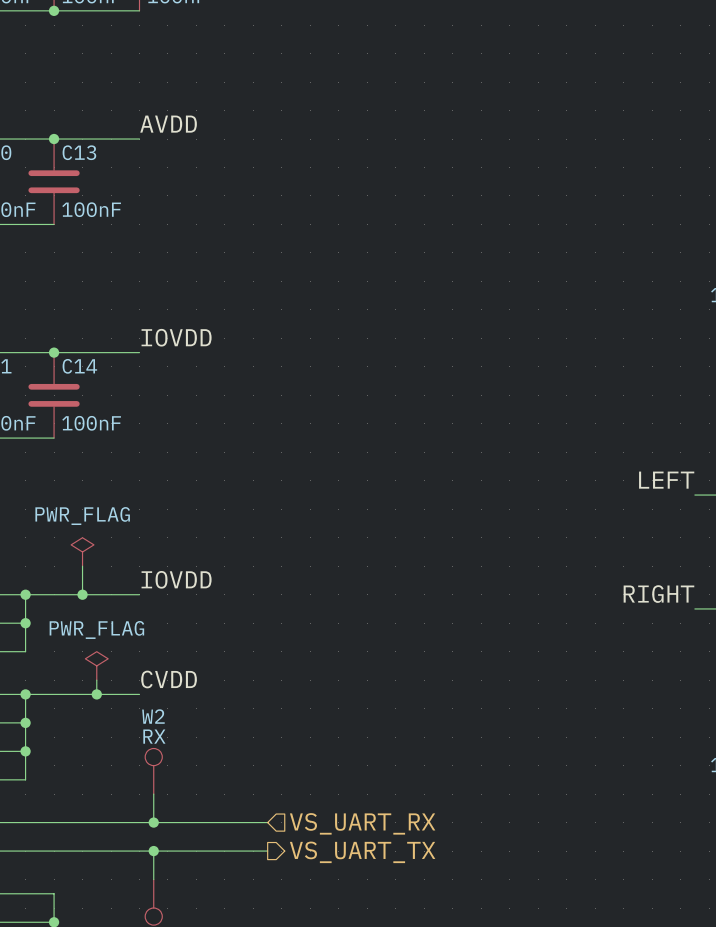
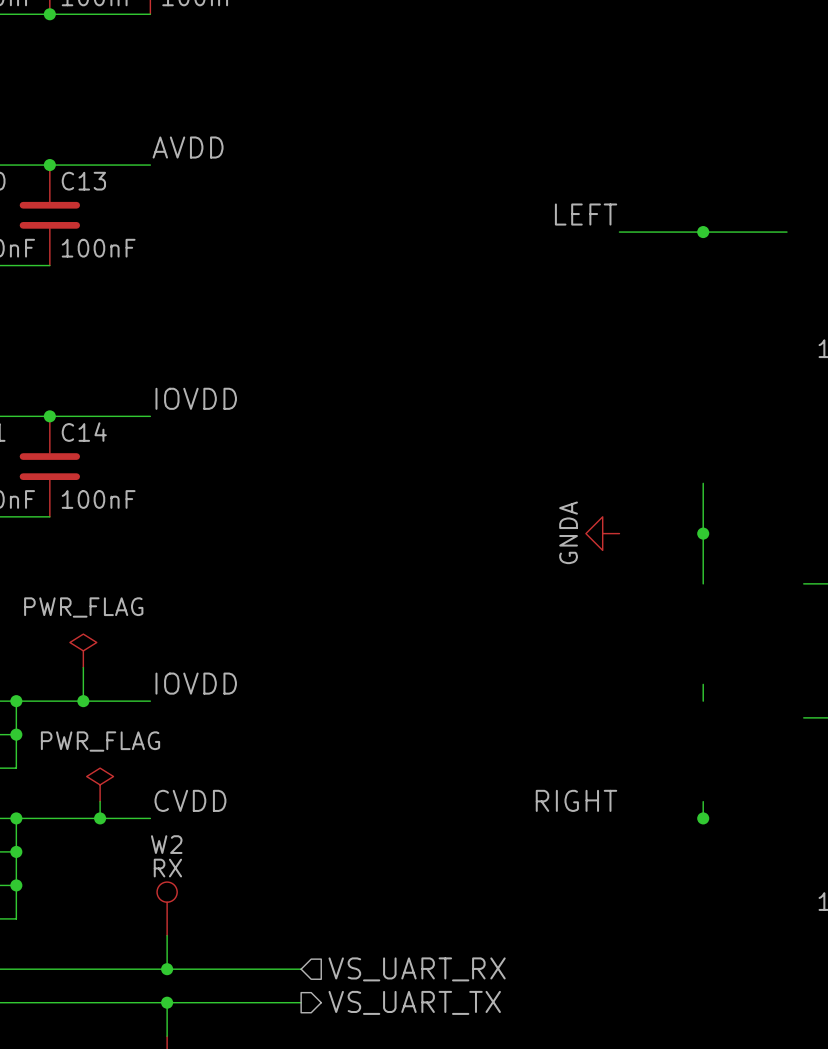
label: none -> LEFT (586, 214)
wire: none -> (619, 232) (786, 232)
junction: none -> (703, 232)
wire: none -> (703, 483) (703, 583)
power symbol: none -> GNDA (602, 533)
junction: none -> (703, 533)
label: LEFT (666, 480) -> none
wire: none -> (703, 684) (703, 701)
label position: RIGHT (658, 594) -> RIGHT (576, 800)
wire: none -> (703, 801) (703, 818)
junction: none -> (703, 818)

